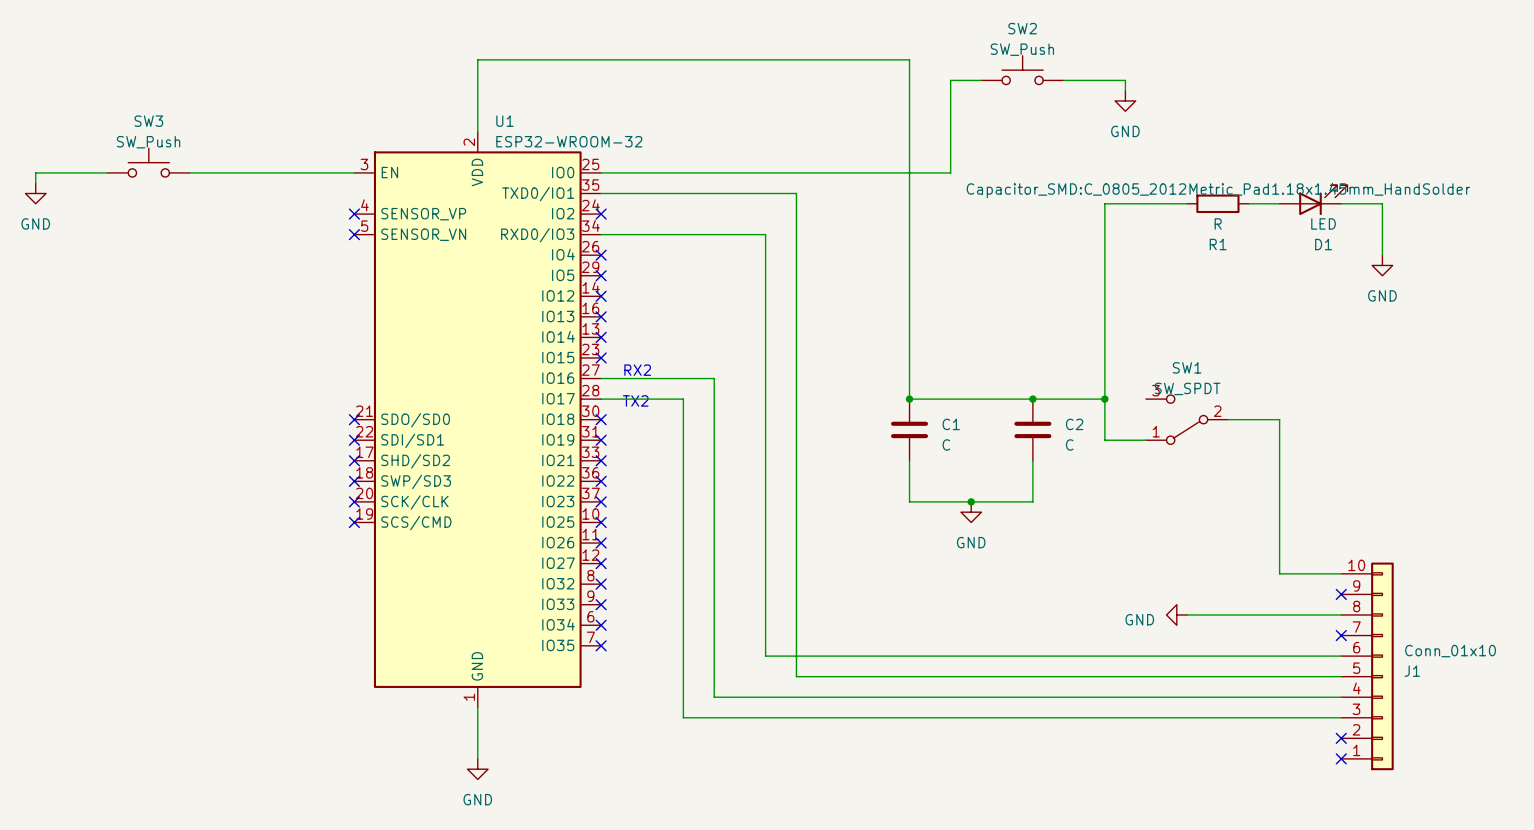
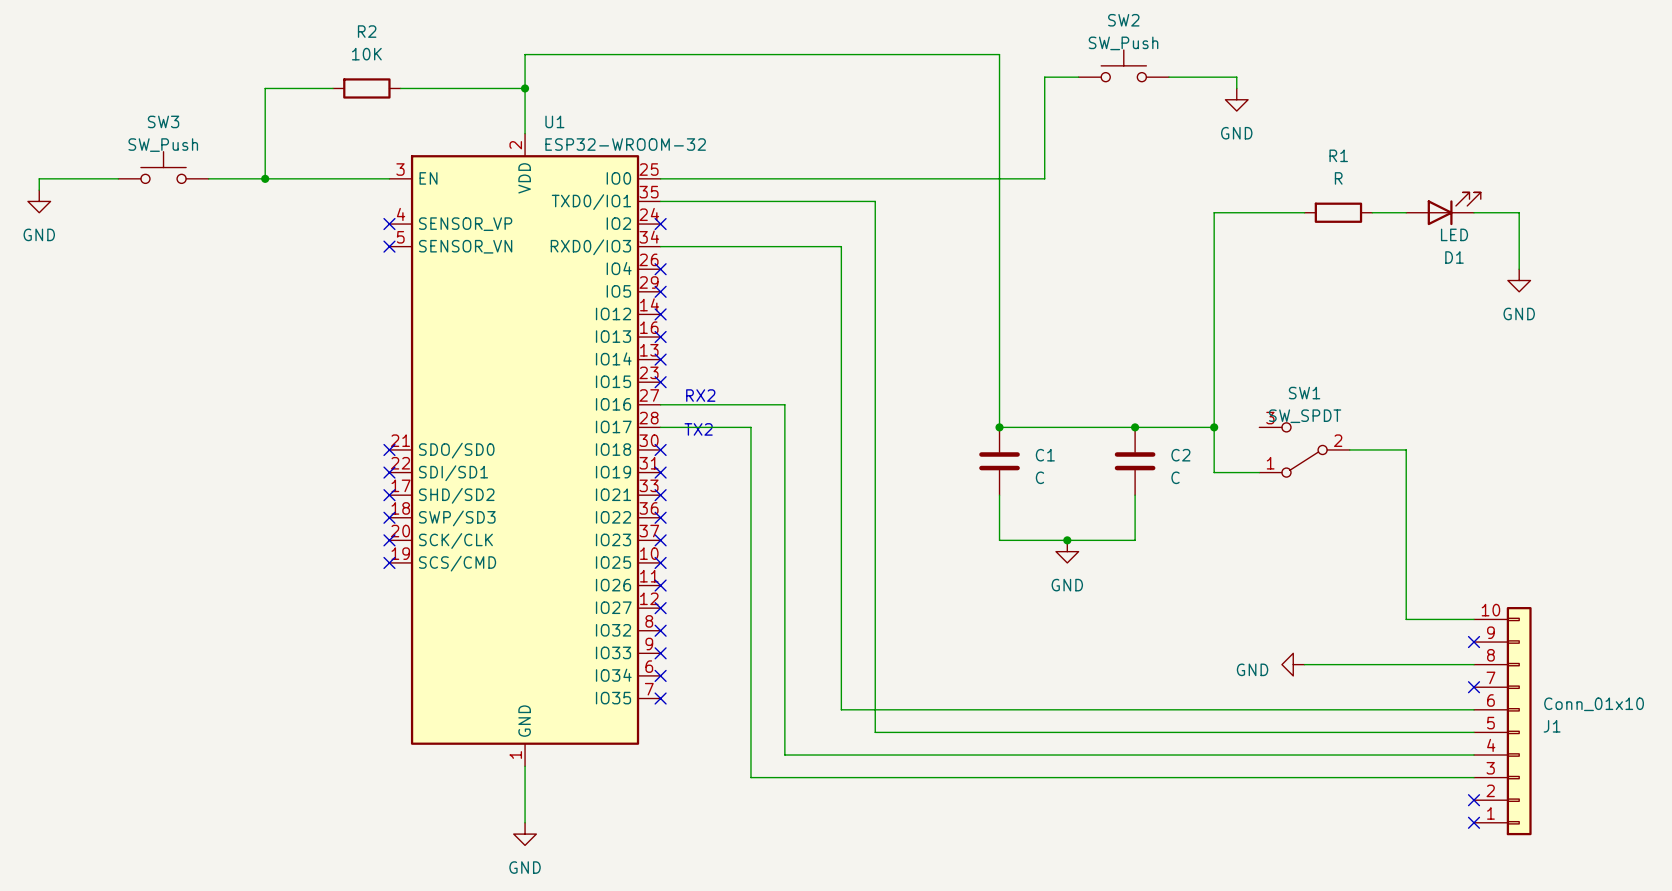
wire: none -> (332, 88) (265, 88) (265, 178)
R2: none -> 10K (366, 88)
wire: none -> (400, 88) (525, 88)
junction: none -> (525, 88)
junction: none -> (265, 178)
R1 text: Capacitor_SMD:C_0805_2012Metric_Pad1.18x1.45mm_HandSolder (1218, 190) -> none
R1 value position: R (1218, 223) -> R (1338, 178)
R1 name position: R1 (1218, 244) -> R1 (1338, 155)

